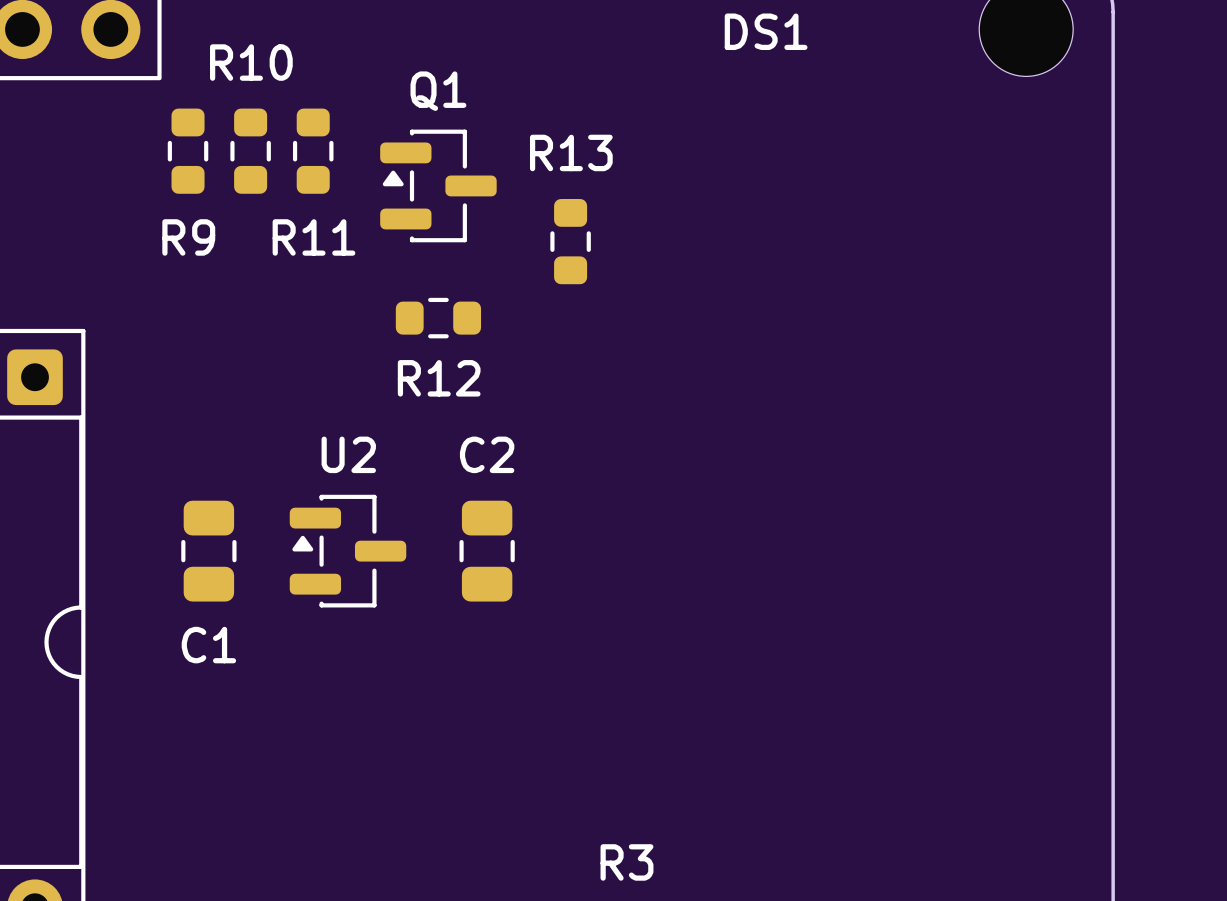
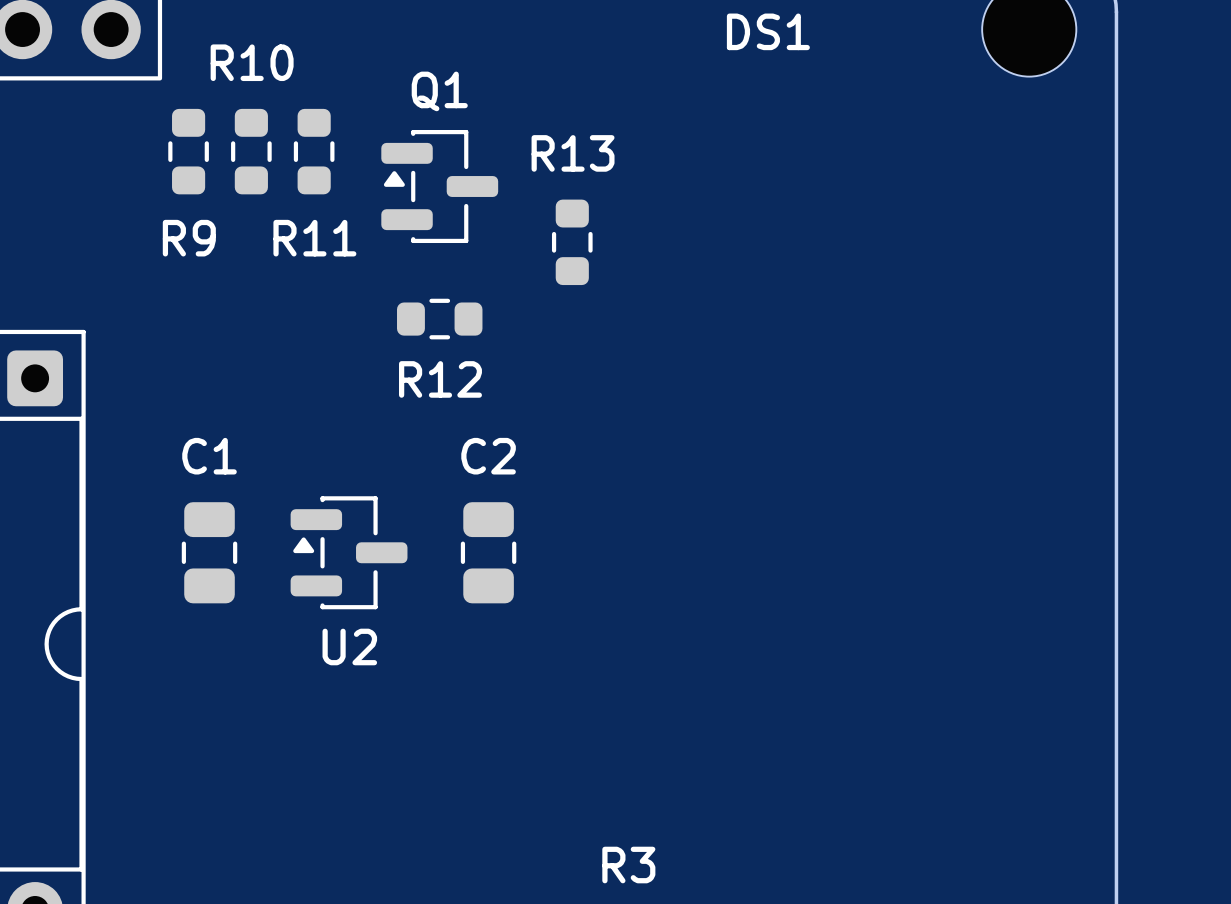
U2 name position: U2 (348, 454) -> U2 (349, 646)
C1 name position: C1 (208, 645) -> C1 (209, 456)

